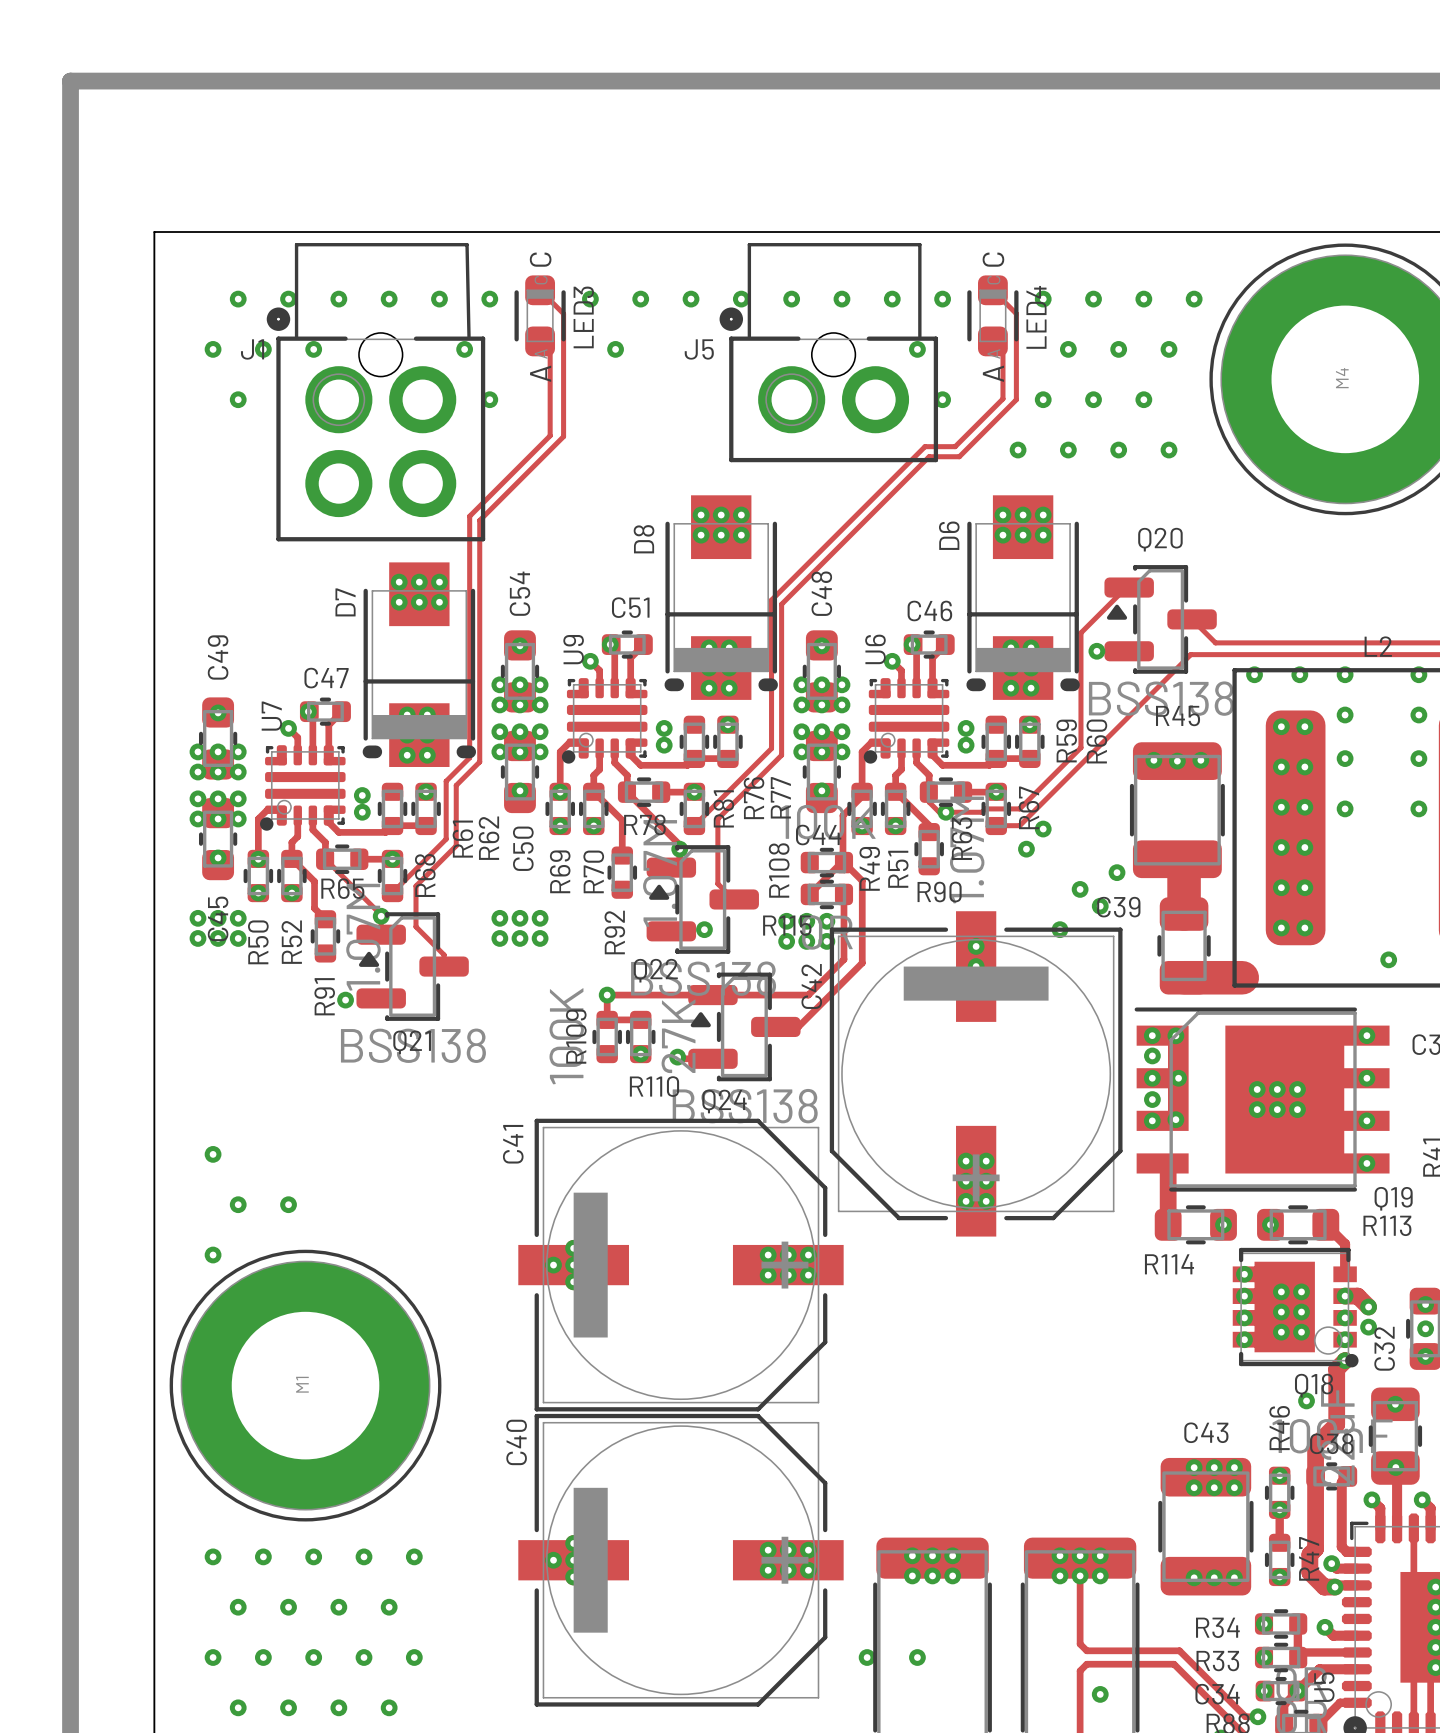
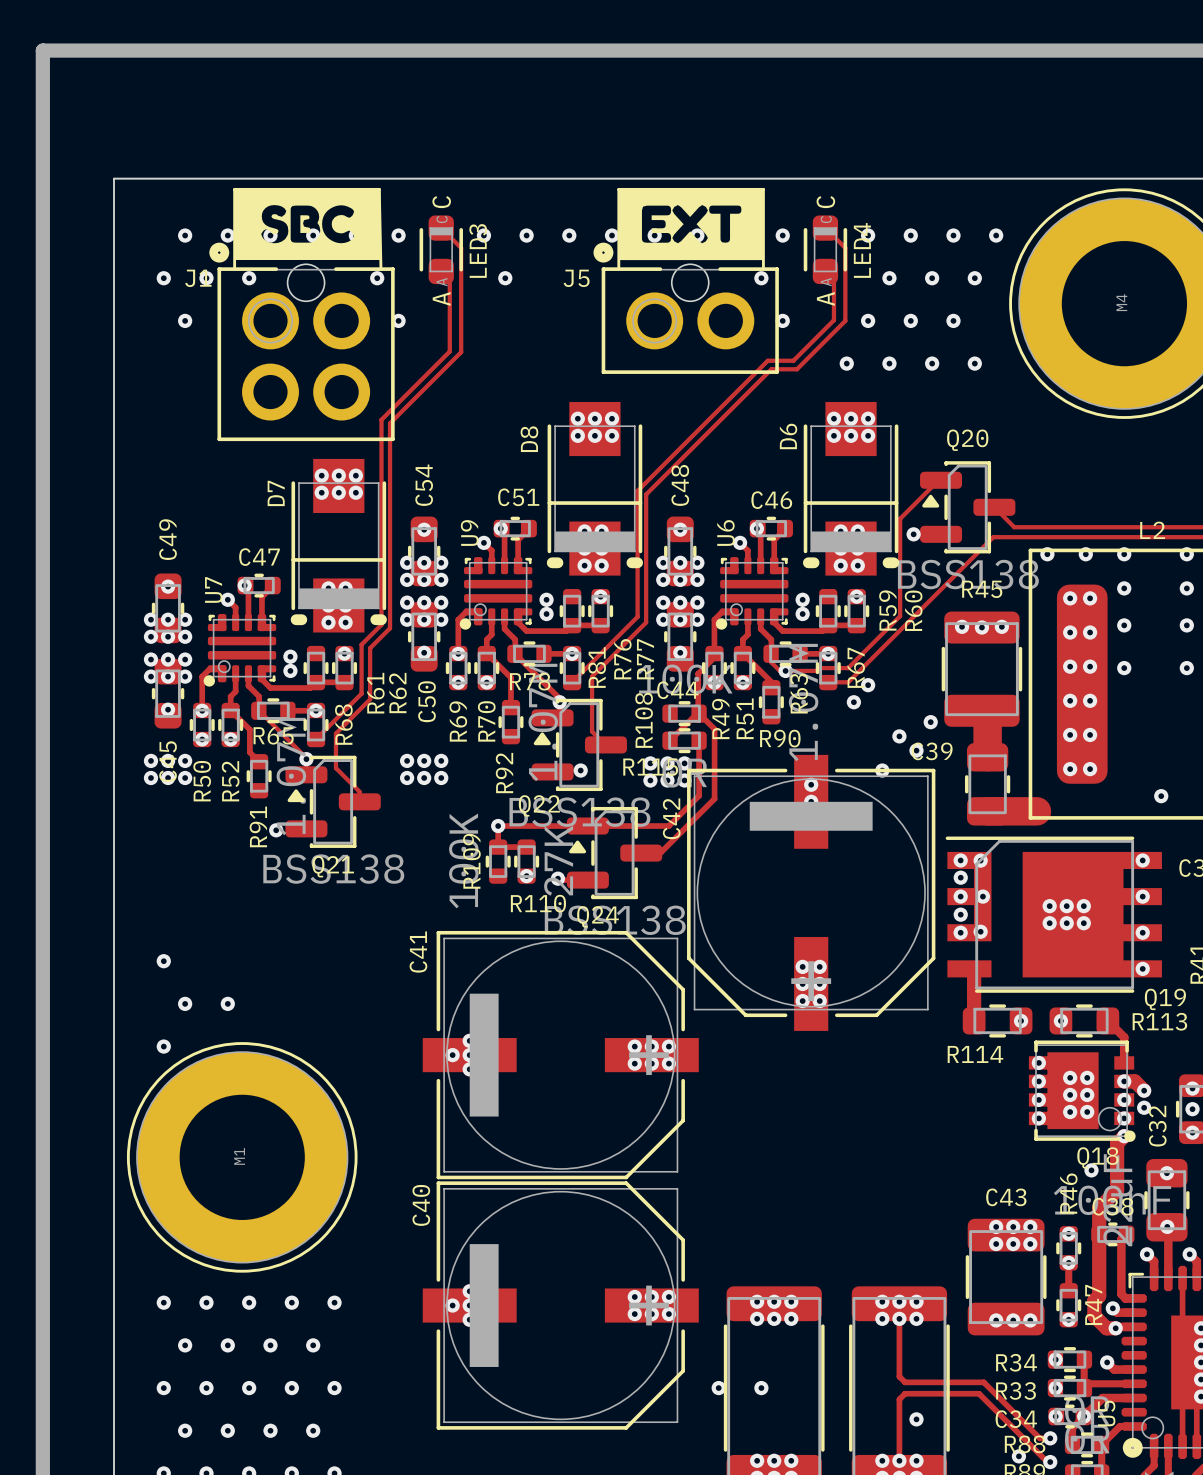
drawing: none -> [234, 188, 381, 260]
drawing: none -> [619, 188, 764, 261]

